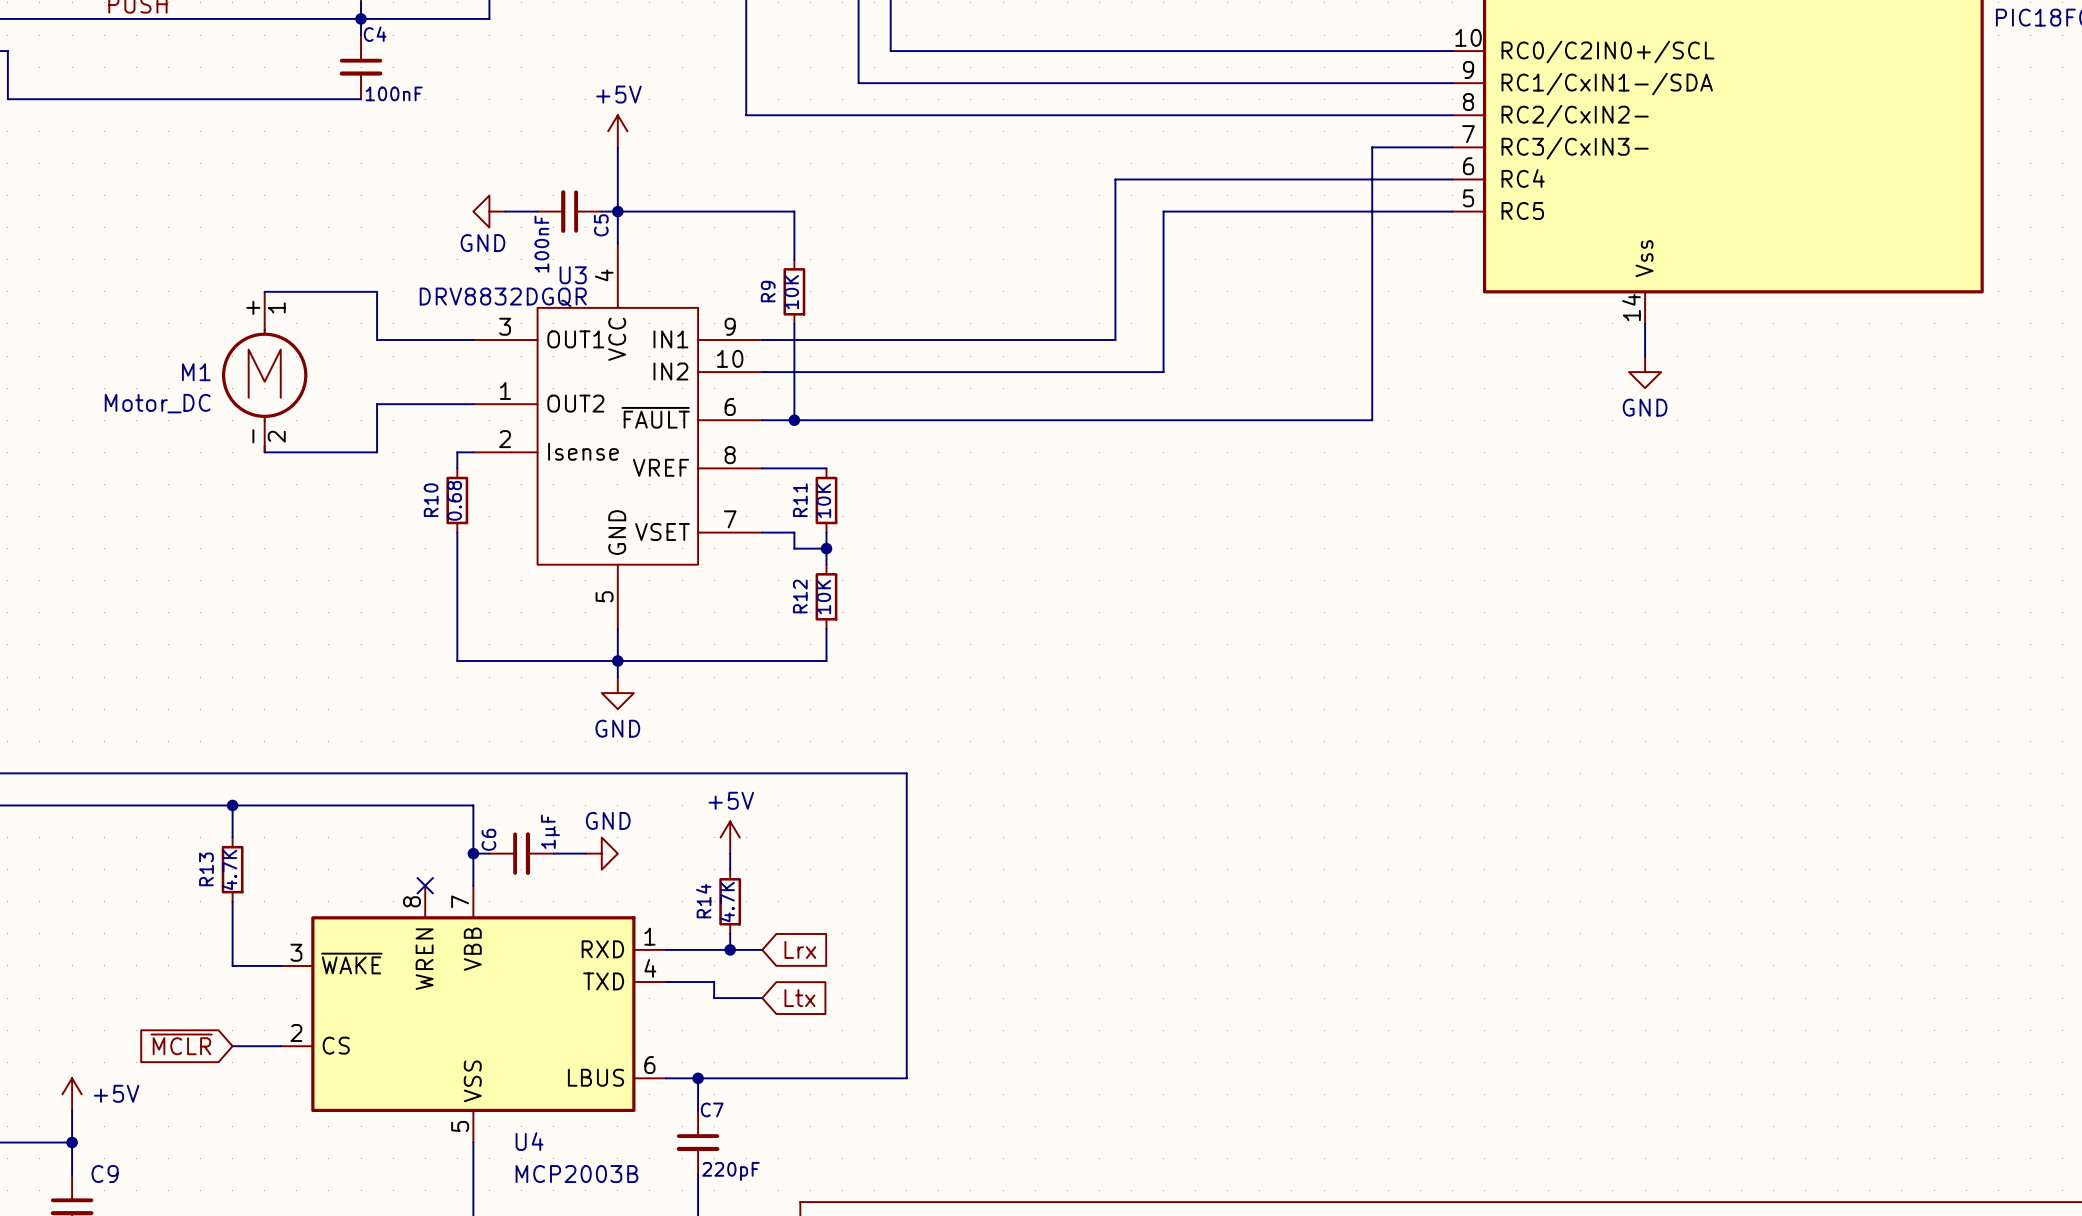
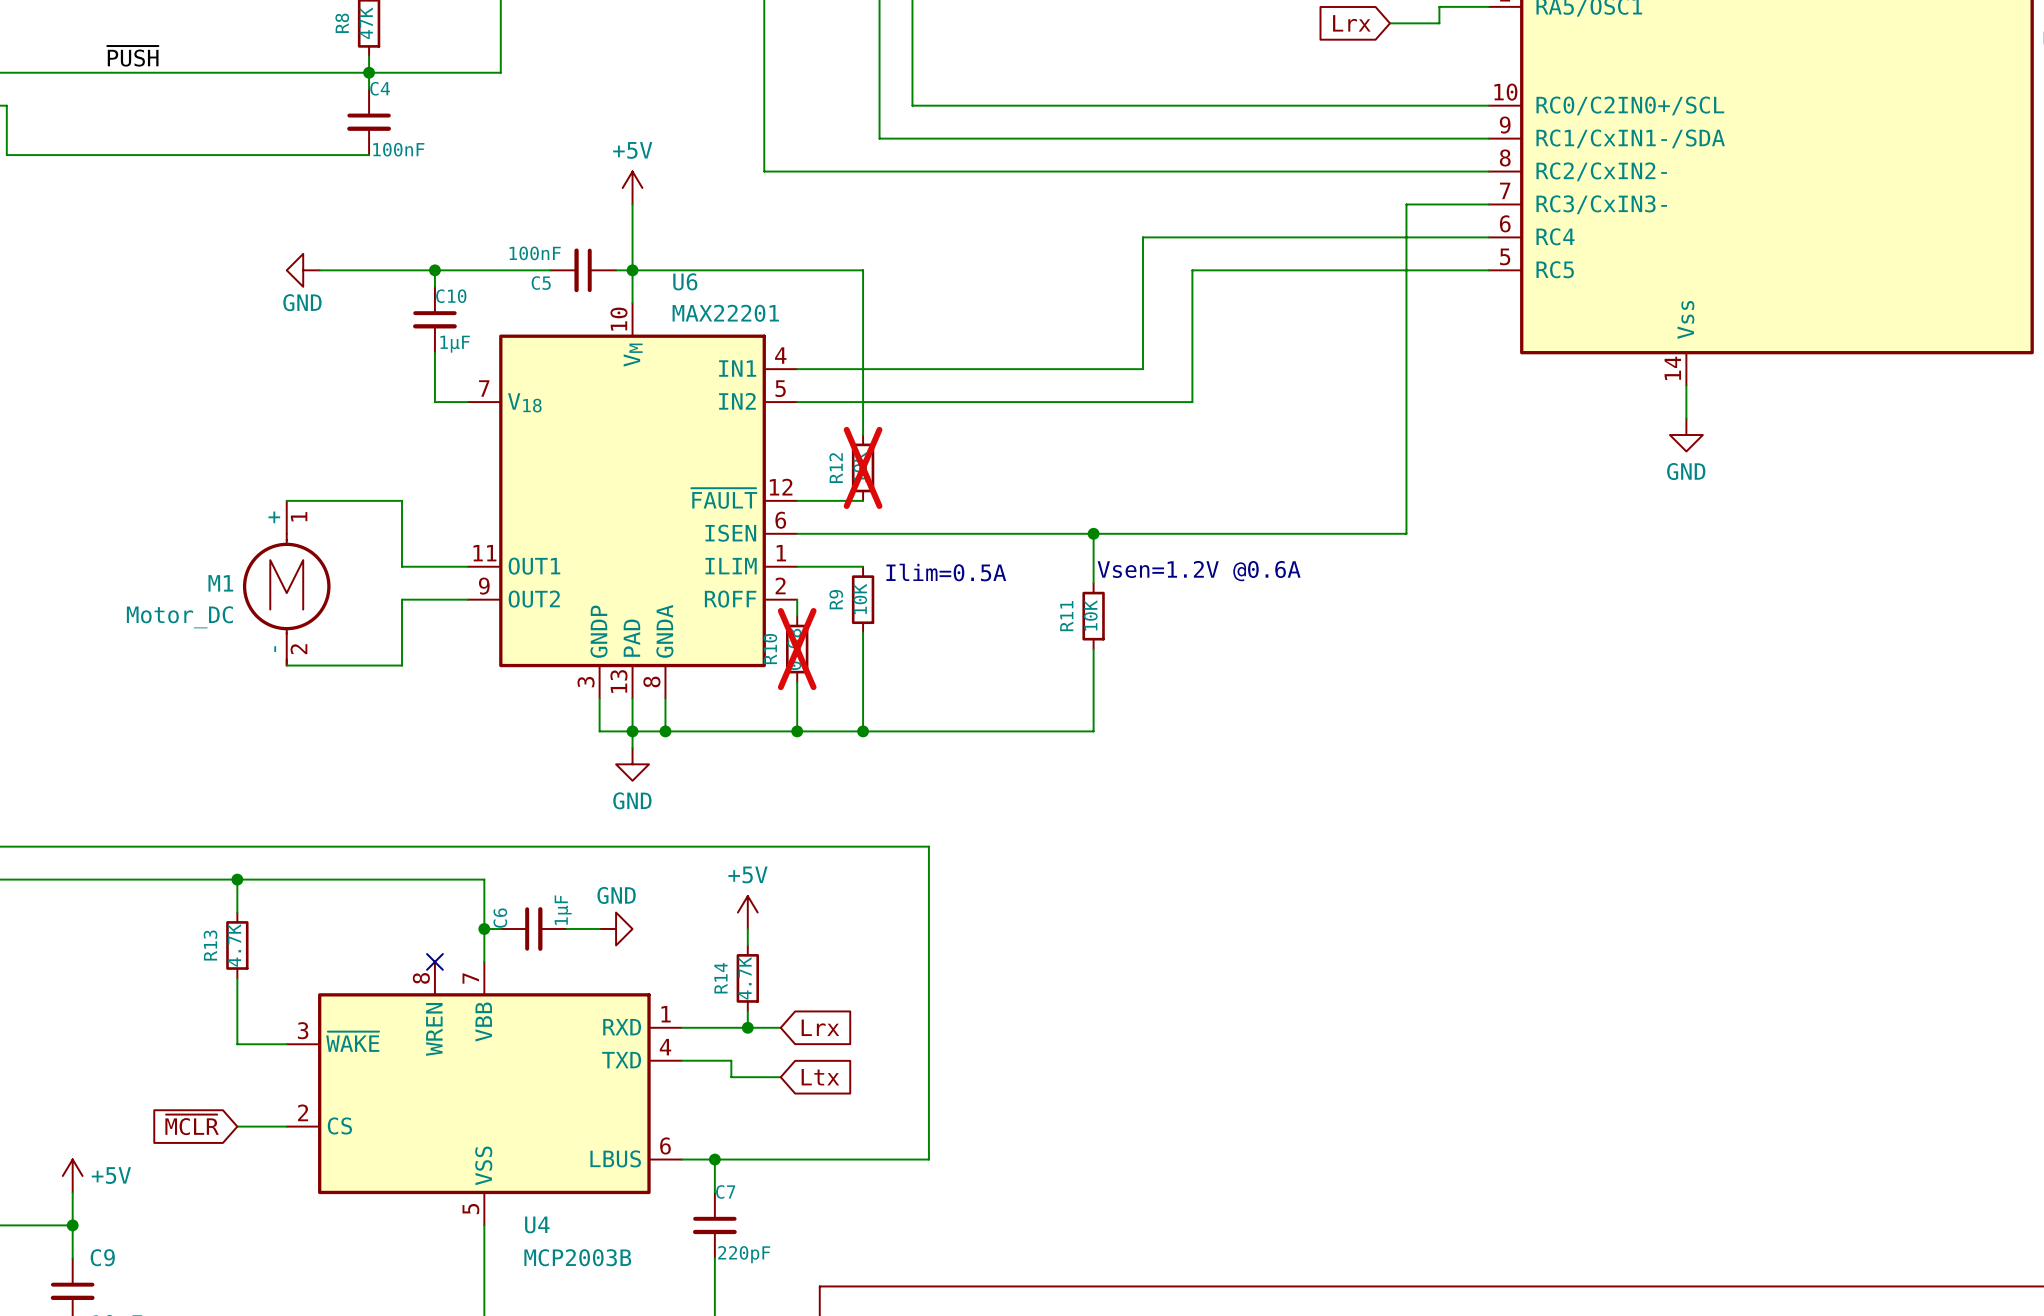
wire: none -> (319, 270) (517, 270)
wire: none -> (434, 270) (434, 286)
junction: none -> (434, 270)
power symbol position: GND (489, 211) -> GND (303, 270)
wire: (794, 211) (794, 259) -> (813, 270) (863, 270) (863, 435)
C5 name rotation: 0° (601, 225) -> 90° clockwise (541, 283)
C5 name position: C5 (601, 225) -> C5 (541, 283)
C5 value rotation: 0° (541, 244) -> 90° clockwise (535, 253)
C10: none -> 1µF (434, 319)
wire: (264, 291) (377, 291) (377, 339) (425, 339) -> (434, 352) (434, 402)
R9 position: (794, 291) -> (863, 599)
wire: none -> (797, 369) (1143, 369)
wire: (1115, 307) (1115, 339) -> (1192, 402) (1143, 402)
wire: (794, 323) (794, 420) -> (863, 632) (863, 731)
wire: (1163, 339) (1163, 372) (762, 372) -> none
M1 position: (264, 372) -> (286, 583)
wire: (473, 404) (377, 404) (377, 452) (264, 452) -> none
R12 do-not-place cross: none -> (863, 467)
wire: (762, 420) (1372, 420) -> (846, 533) (1406, 533) (1406, 484)
junction: (794, 420) -> none
wire: none -> (286, 500) (402, 500) (402, 566) (467, 566)
U3: DRV8832DGQR (617, 436) -> none
U6: none -> MAX22201 (632, 500)
wire: none -> (797, 500) (863, 500)
wire: (473, 452) (457, 452) (457, 468) -> none
wire: none -> (1093, 533) (1093, 583)
junction: none -> (1093, 533)
R10 position: (457, 500) -> (797, 649)
wire: none -> (797, 566) (863, 566)
R11 position: (826, 500) -> (1093, 616)
text: none -> Vsen=1.2V @0.6A (1199, 571)
text: none -> Ilim=0.5A (946, 572)
wire: (457, 532) (457, 661) (585, 661) -> (599, 698) (599, 731)
wire: none -> (467, 599) (402, 599) (402, 665) (286, 665)
wire: (762, 532) (794, 532) (794, 548) (826, 548) -> none
wire: none -> (797, 599) (797, 616)
wire: (826, 532) (826, 564) -> (665, 698) (665, 731)
junction: (826, 548) -> none
R10 do-not-place cross: none -> (797, 649)
R12 position: (826, 596) -> (863, 467)
wire: none -> (797, 682) (797, 731)
wire: (826, 628) (826, 661) -> (1093, 649) (1093, 731) (846, 731)
junction: none -> (665, 731)
junction: none -> (797, 731)
junction: none -> (863, 731)

